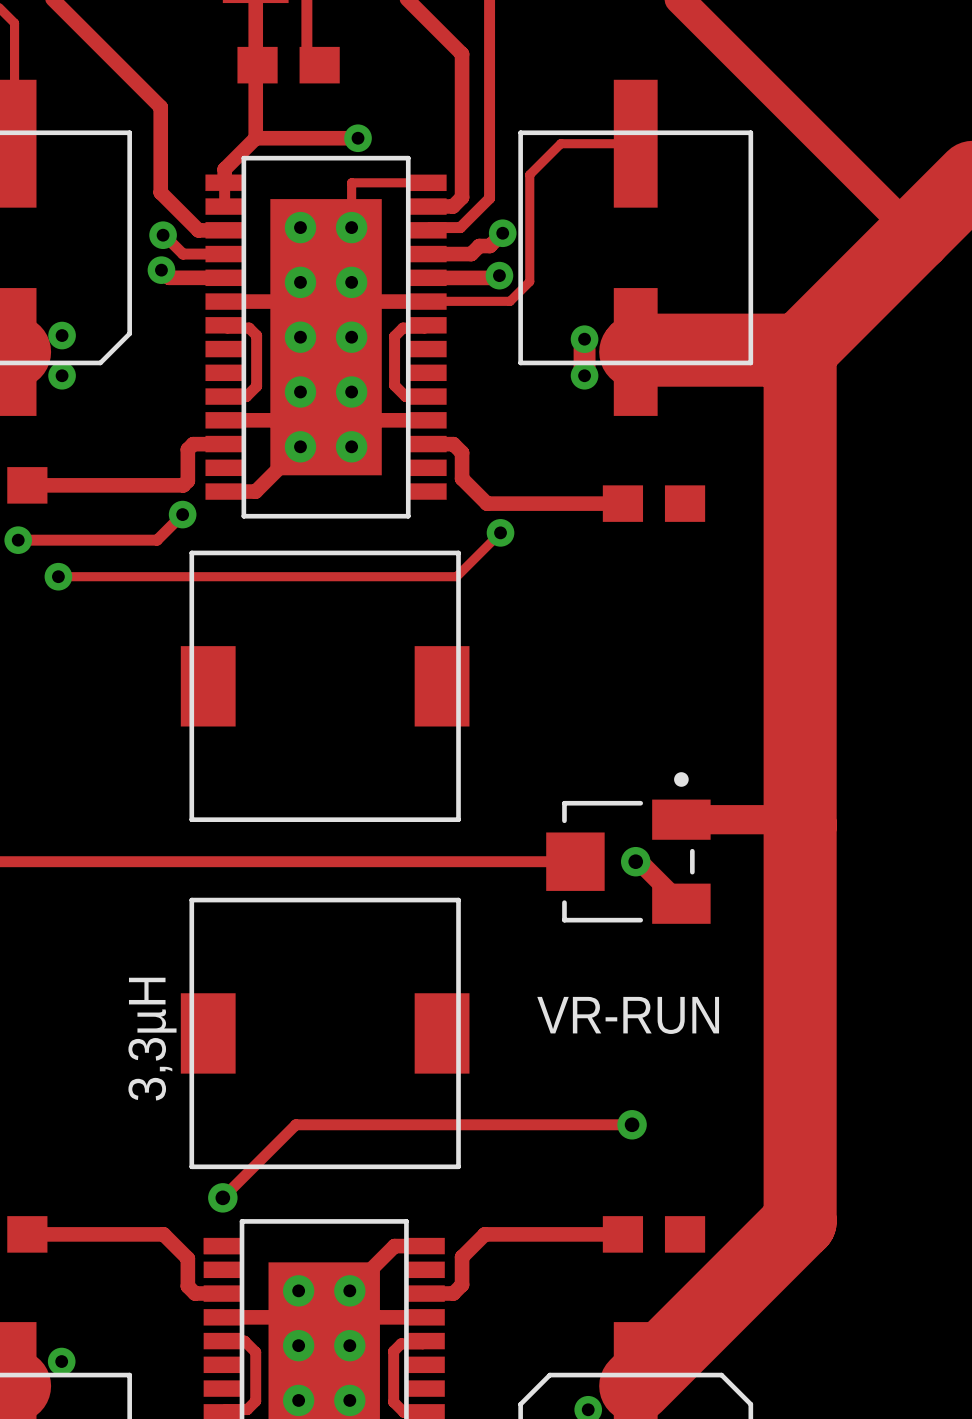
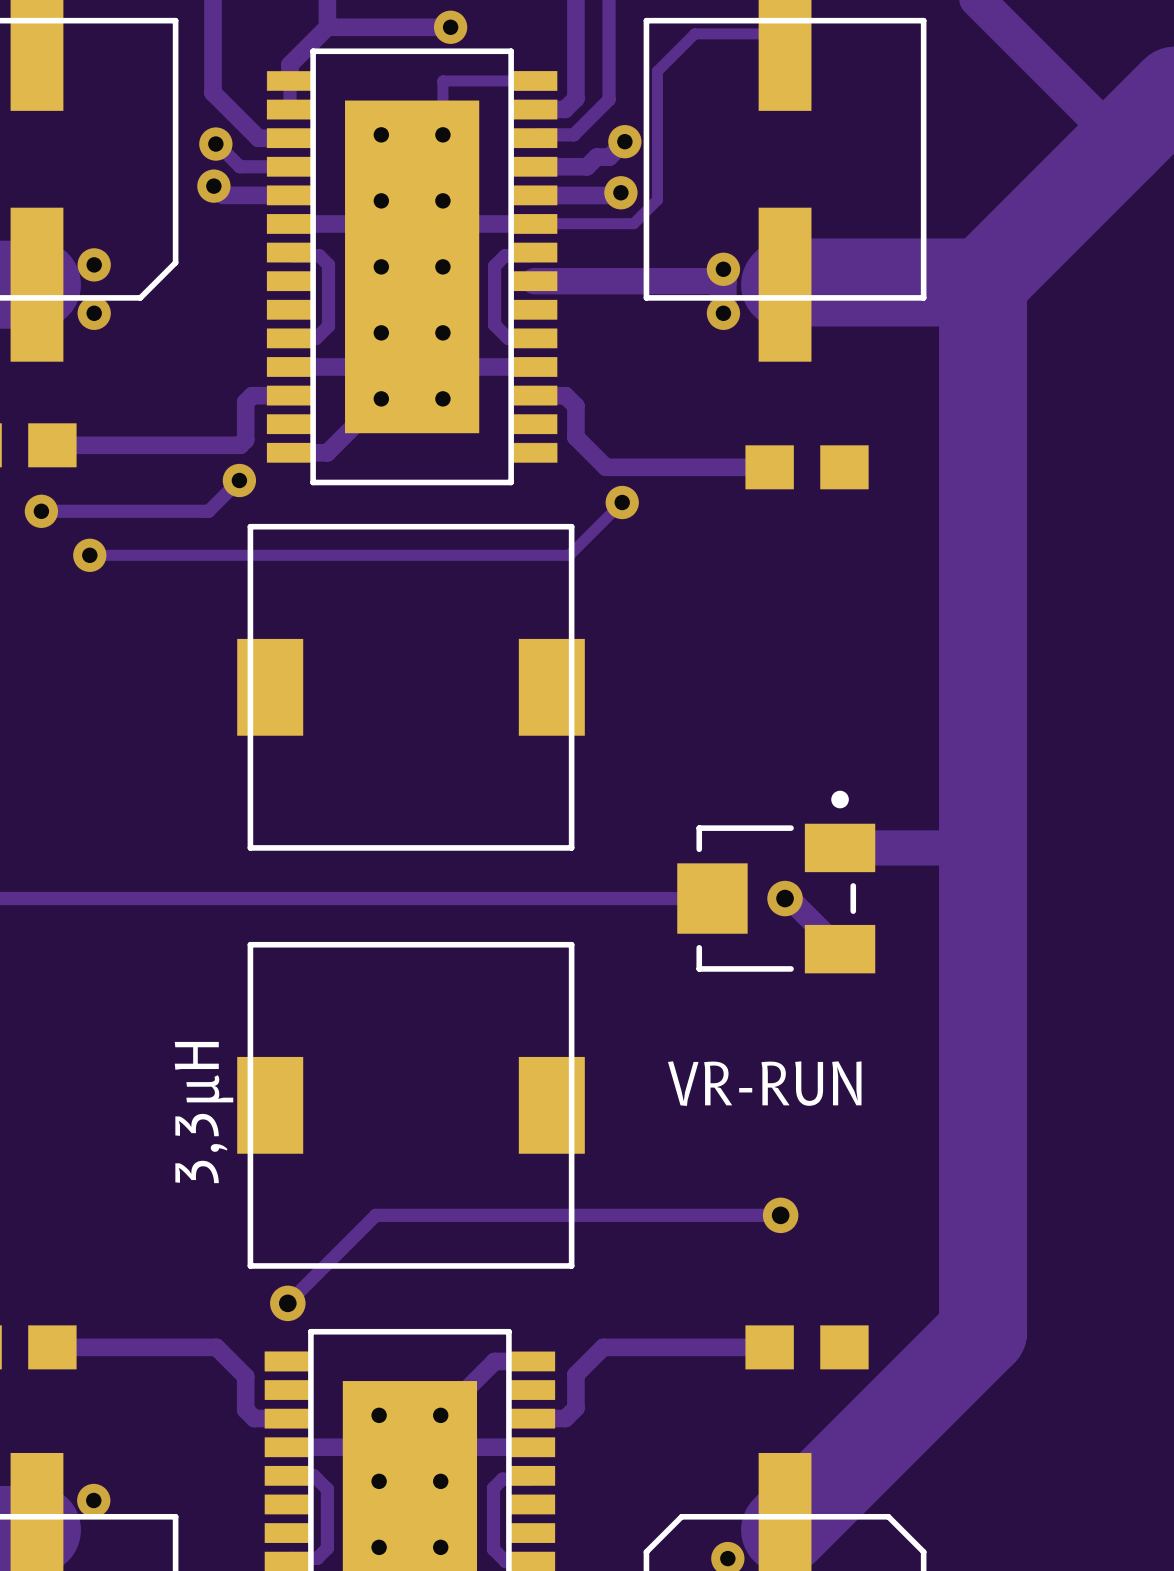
track: none -> (534, 281) (723, 281)

